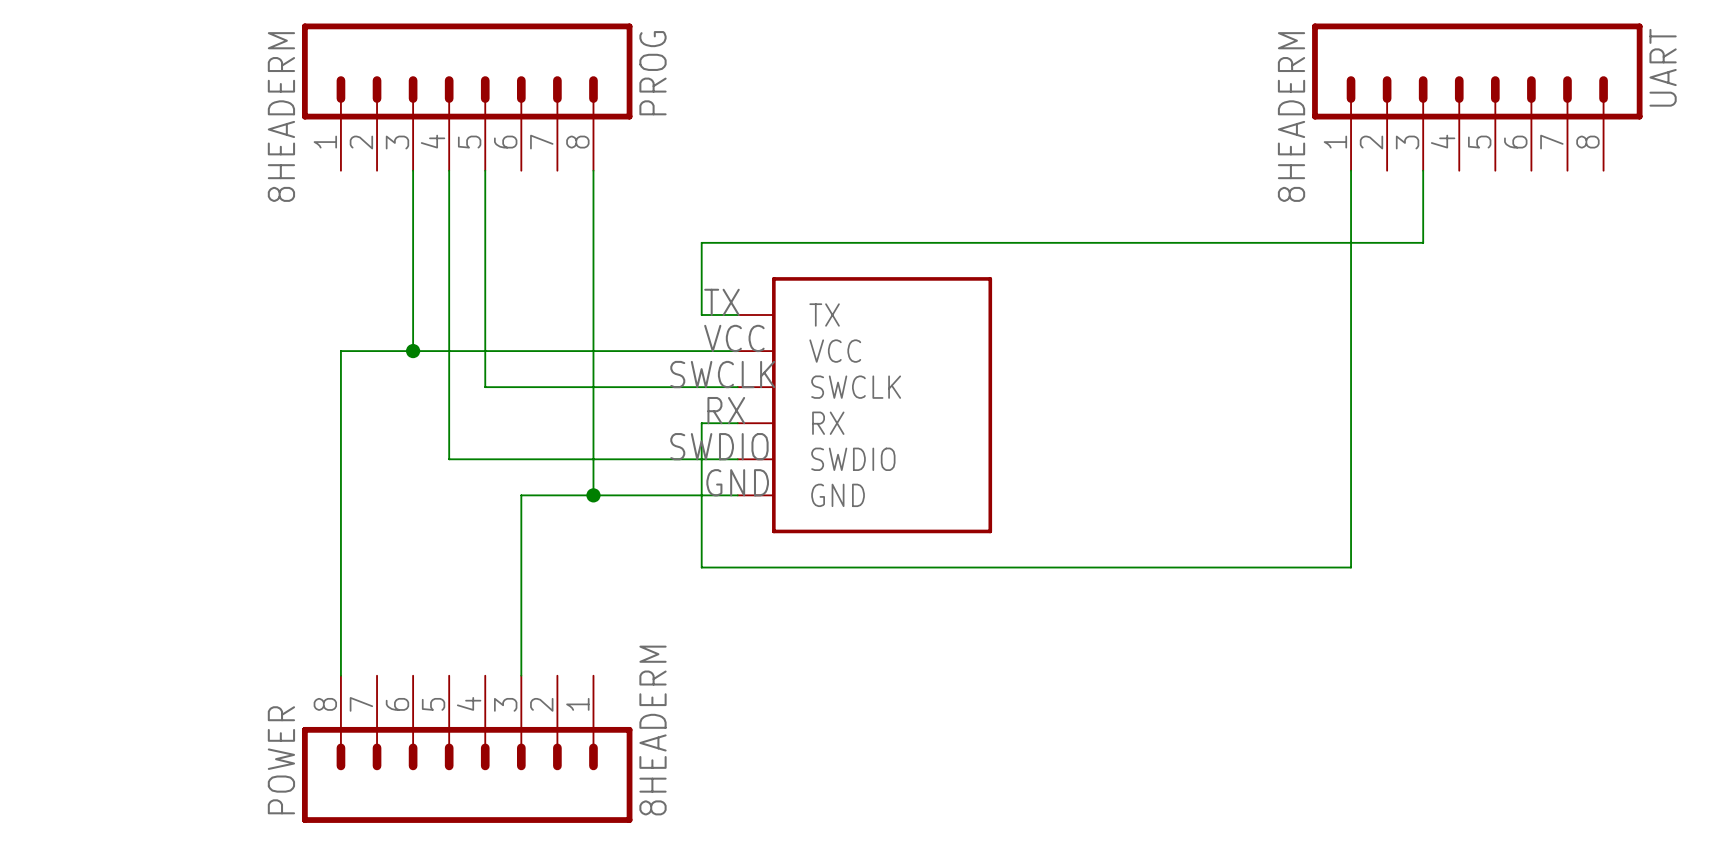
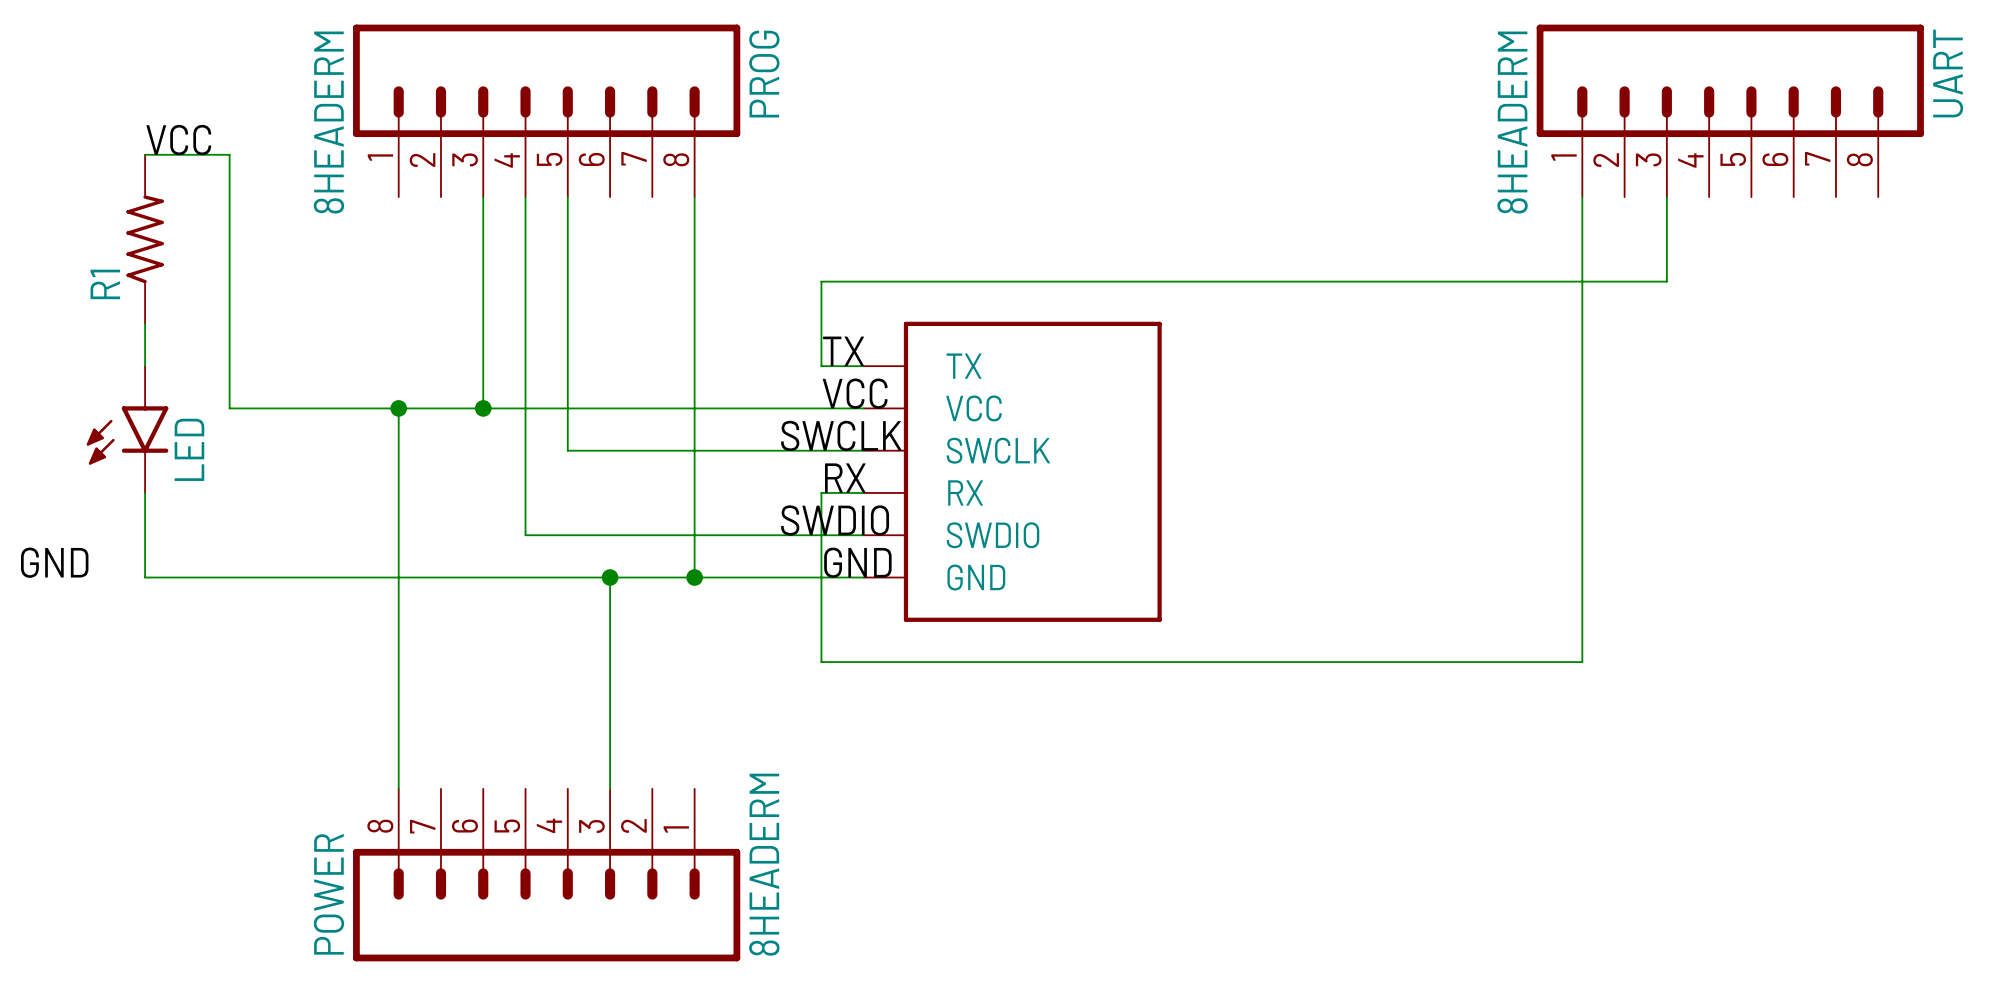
label: none -> VCC (178, 140)
wire: none -> (145, 154) (229, 154) (229, 408) (398, 408)
R1: none -> (145, 239)
wire: none -> (145, 323) (145, 366)
junction: none -> (398, 408)
LED: none -> (127, 429)
wire: none -> (145, 492) (145, 577) (610, 577)
label: none -> GND (54, 562)
junction: none -> (610, 577)

